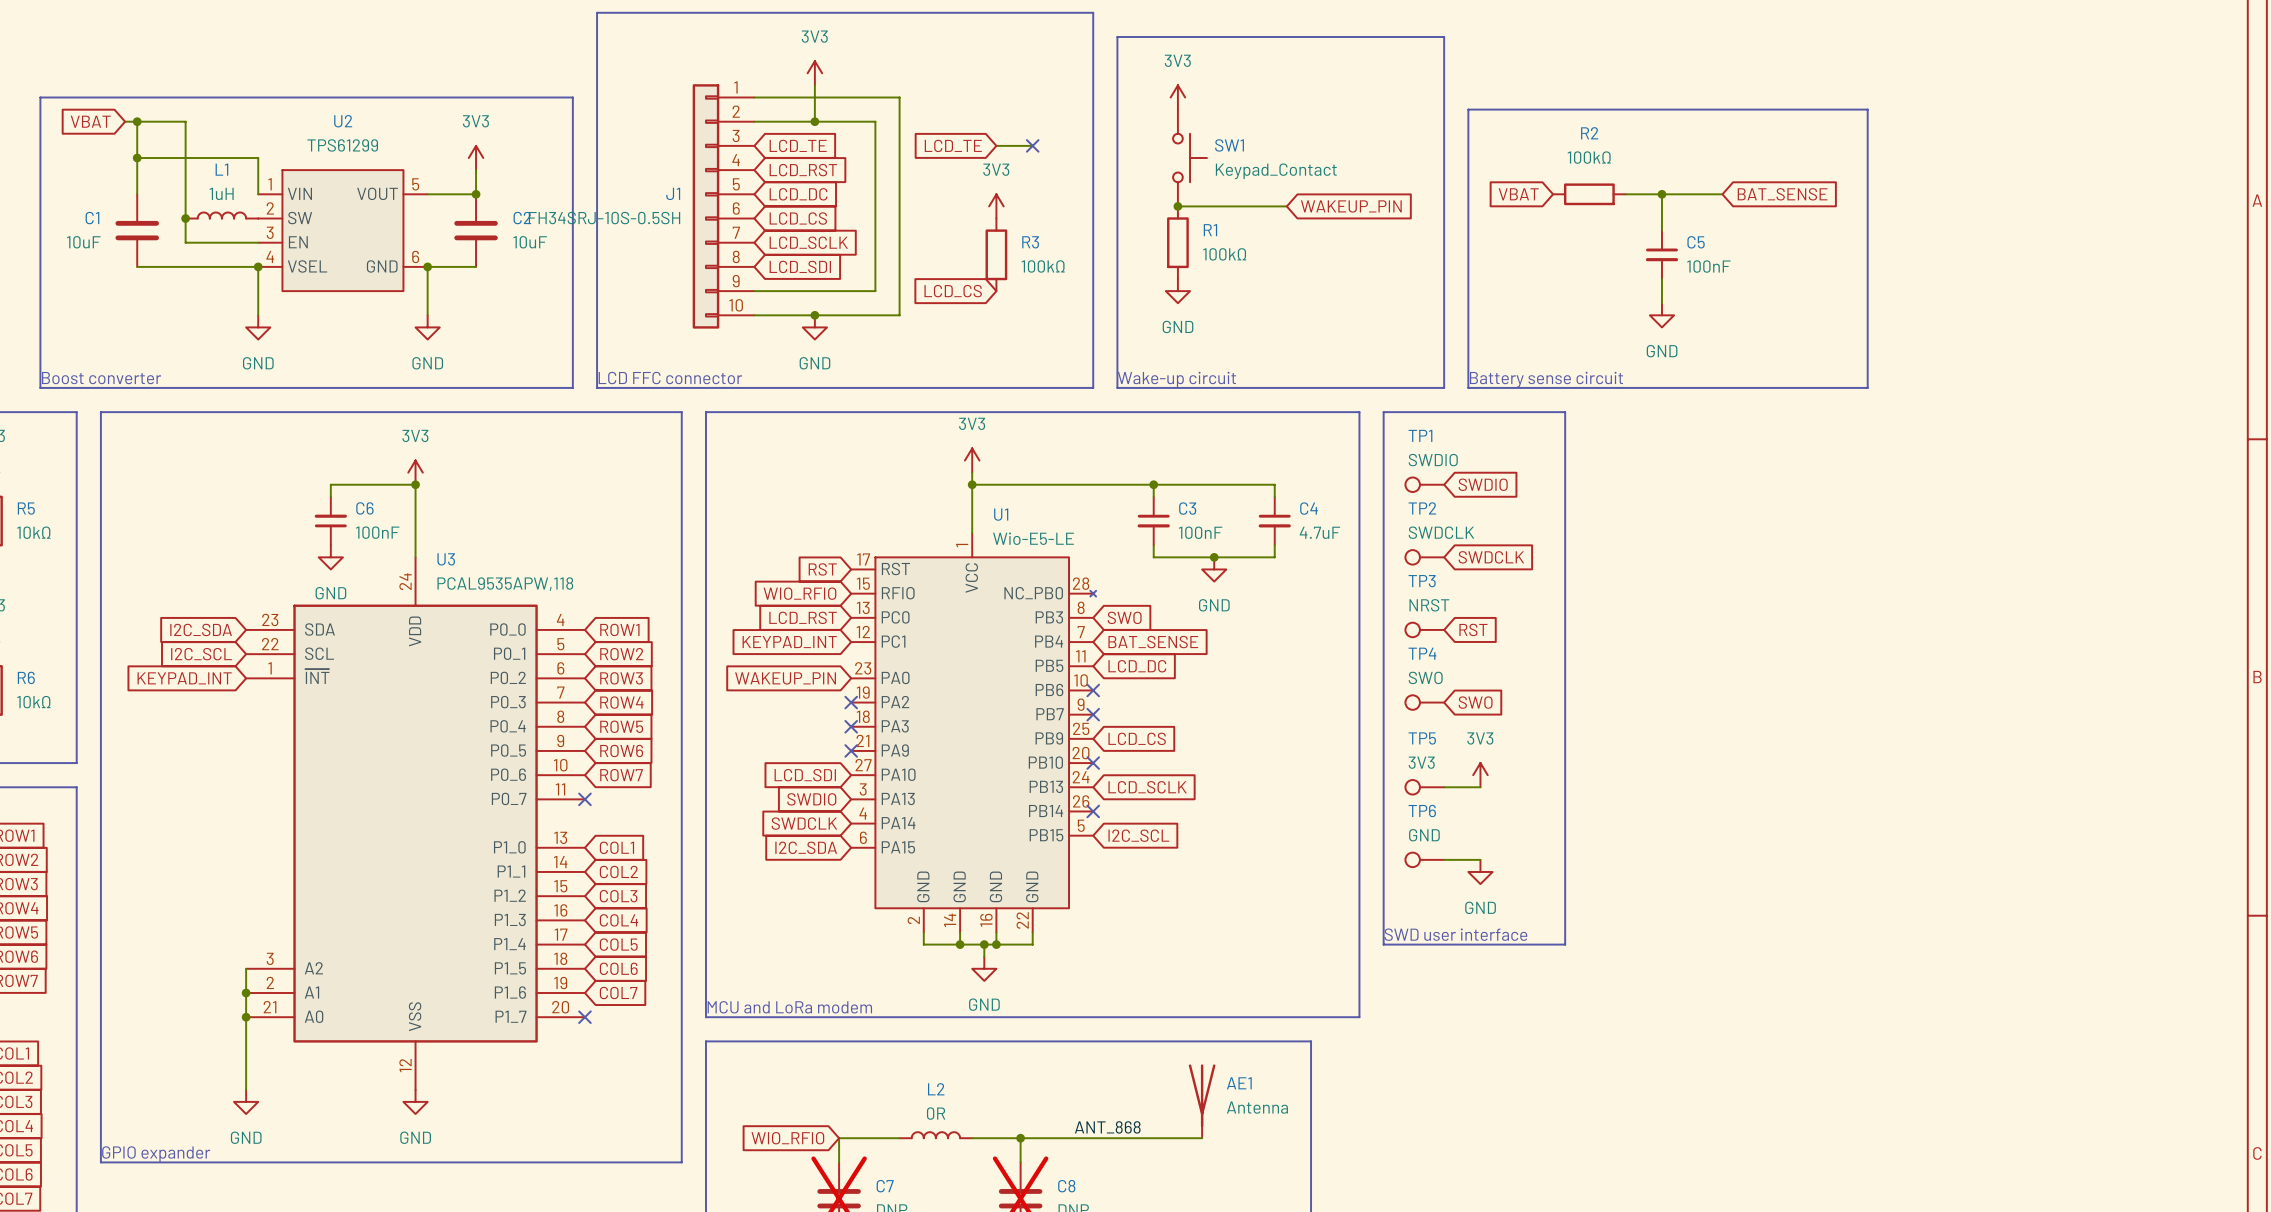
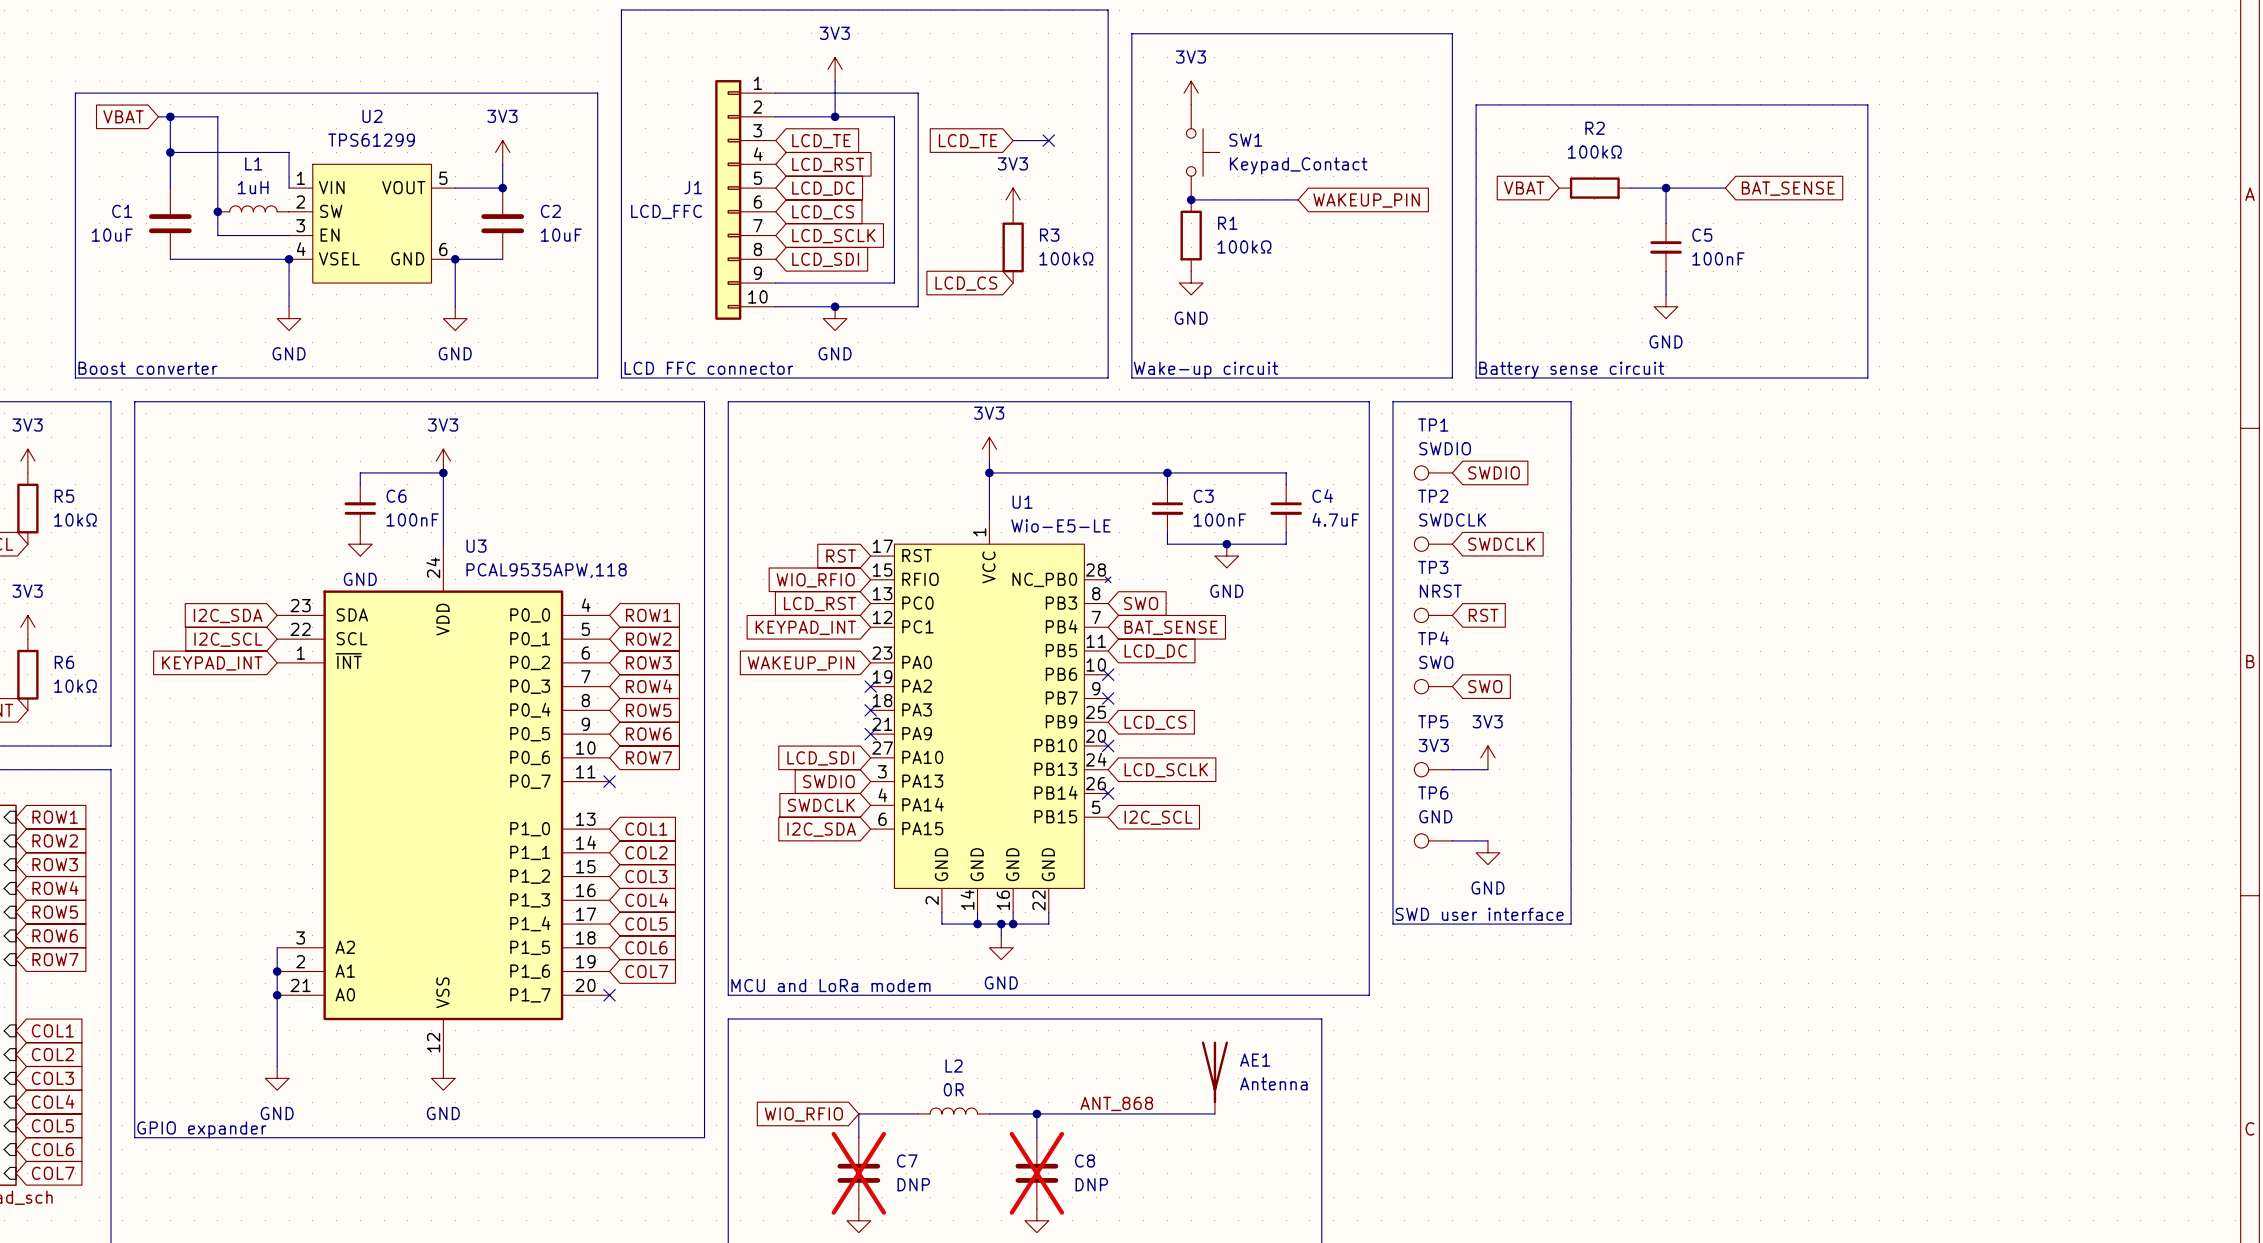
J1 value: FH34SRJ-10S-0.5SH (604, 218) -> LCD_FFC (666, 211)

